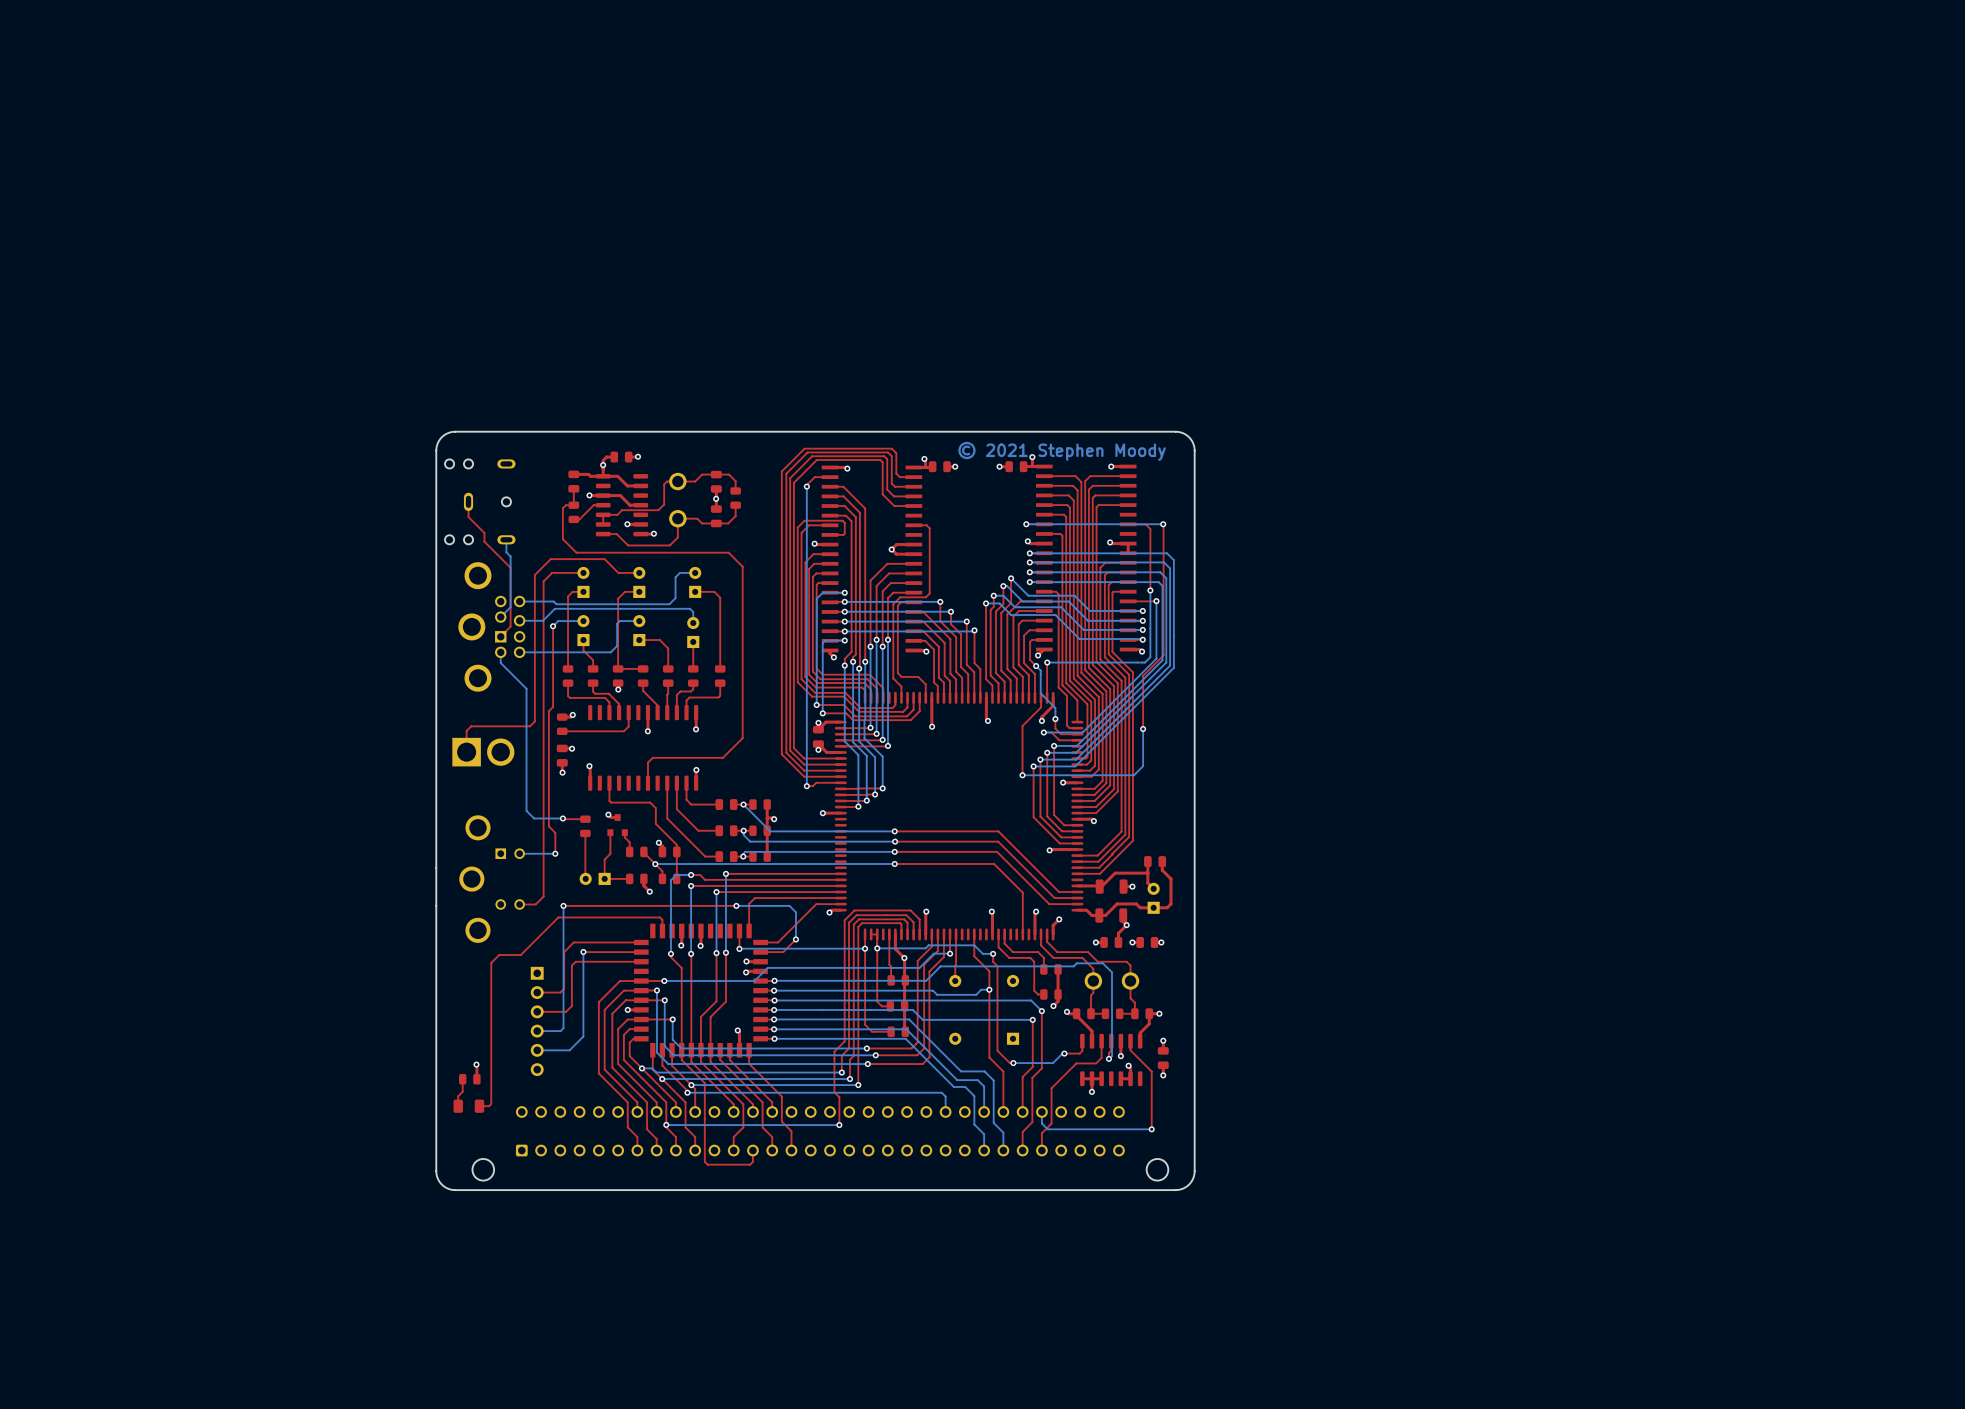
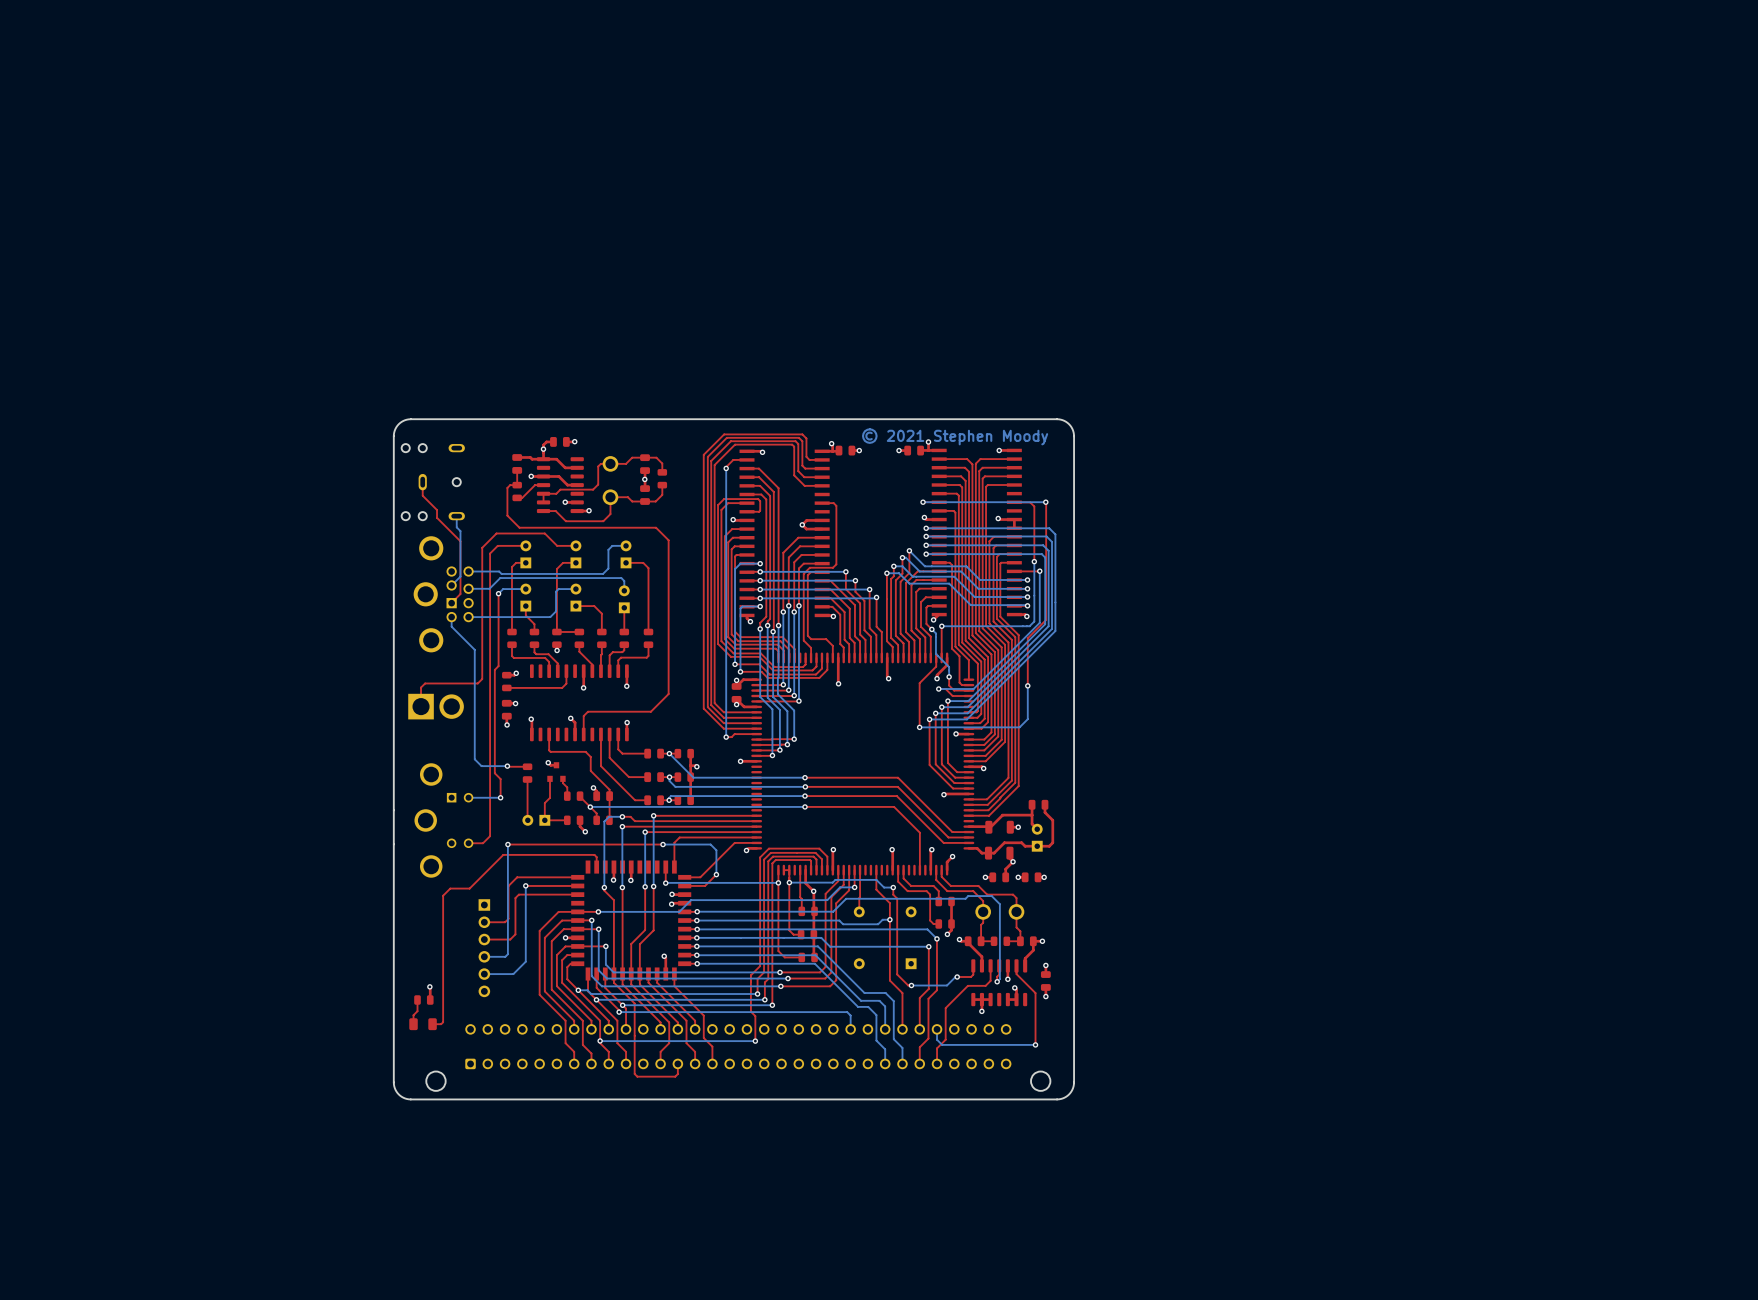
top track: none -> (570, 718) (575, 722) (575, 734)
via: none -> (570, 718)

